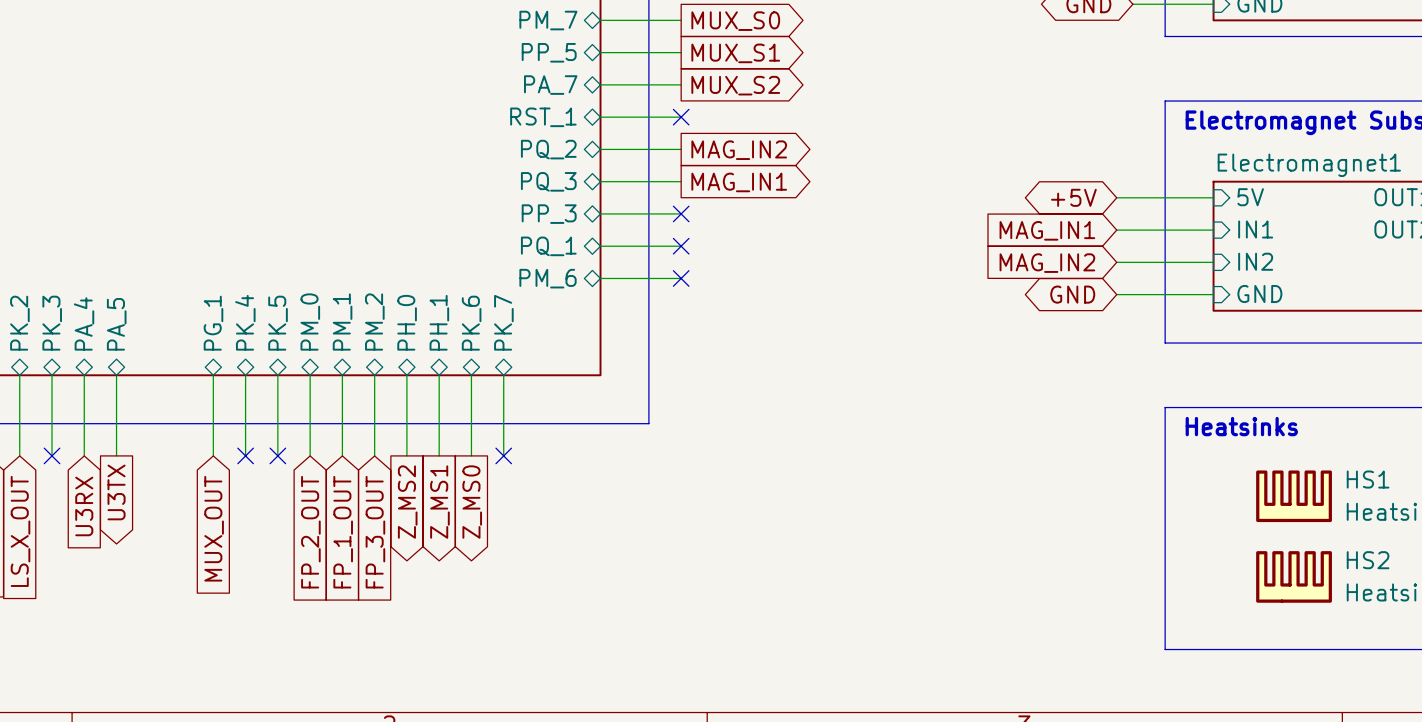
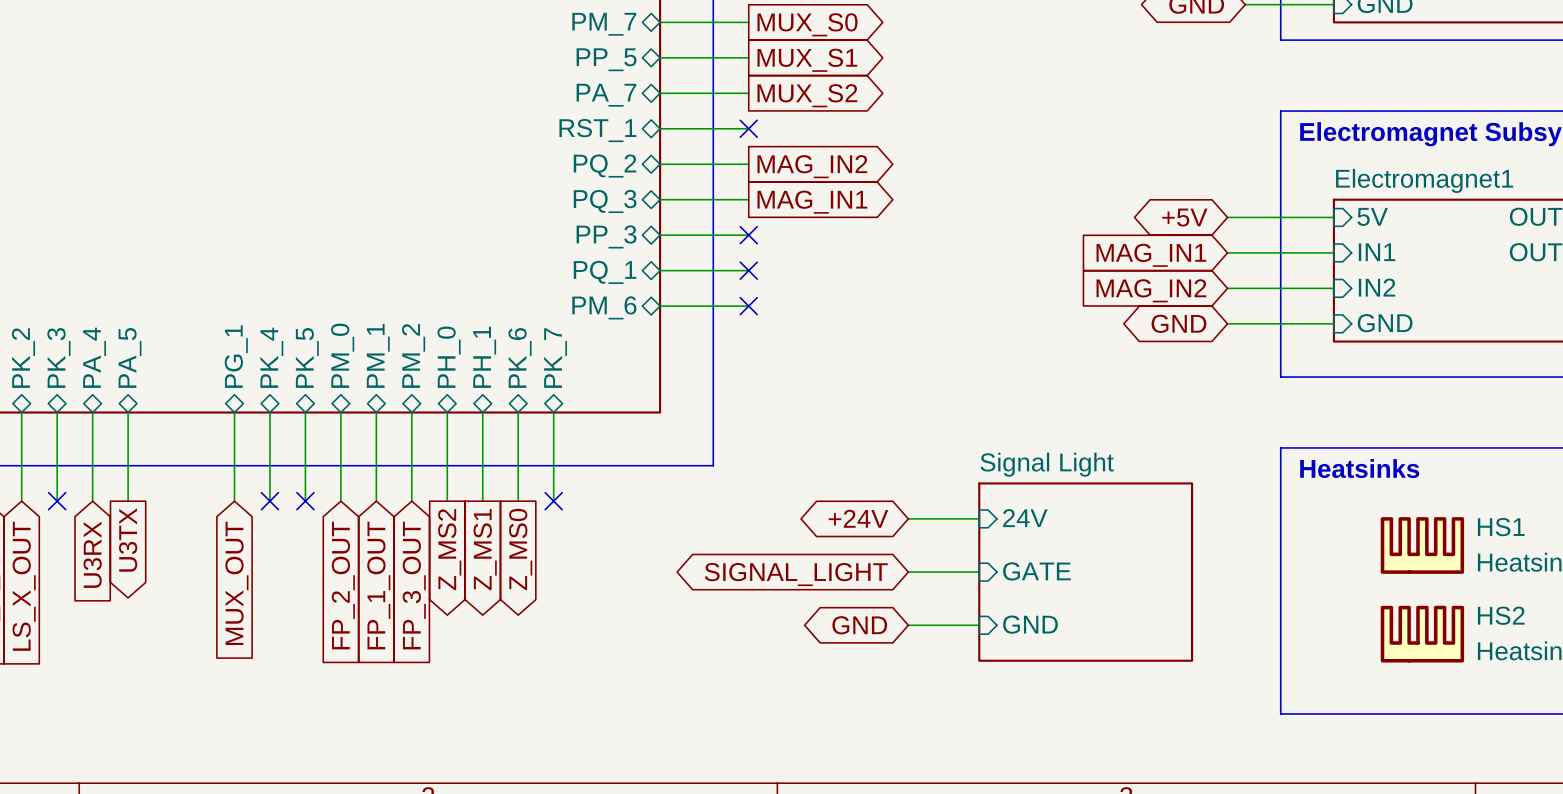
global label: none -> +24V (858, 518)
sheet pin: none -> 24V (1025, 518)
wire: none -> (908, 518) (979, 518)
sheet pin: none -> GATE (1036, 571)
wire: none -> (908, 572) (979, 572)
sheet Signal Light: none -> (1085, 572)
global label: none -> SIGNAL_LIGHT (796, 574)
global label: none -> GND (859, 625)
wire: none -> (908, 625) (979, 625)
sheet pin: none -> GND (1030, 624)

